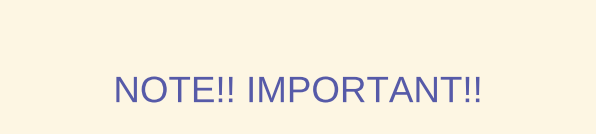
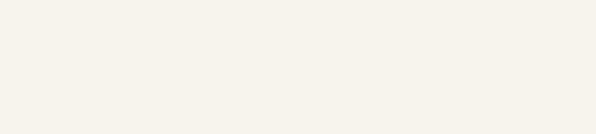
text: NOTE!! IMPORTANT!! (297, 89) -> none

